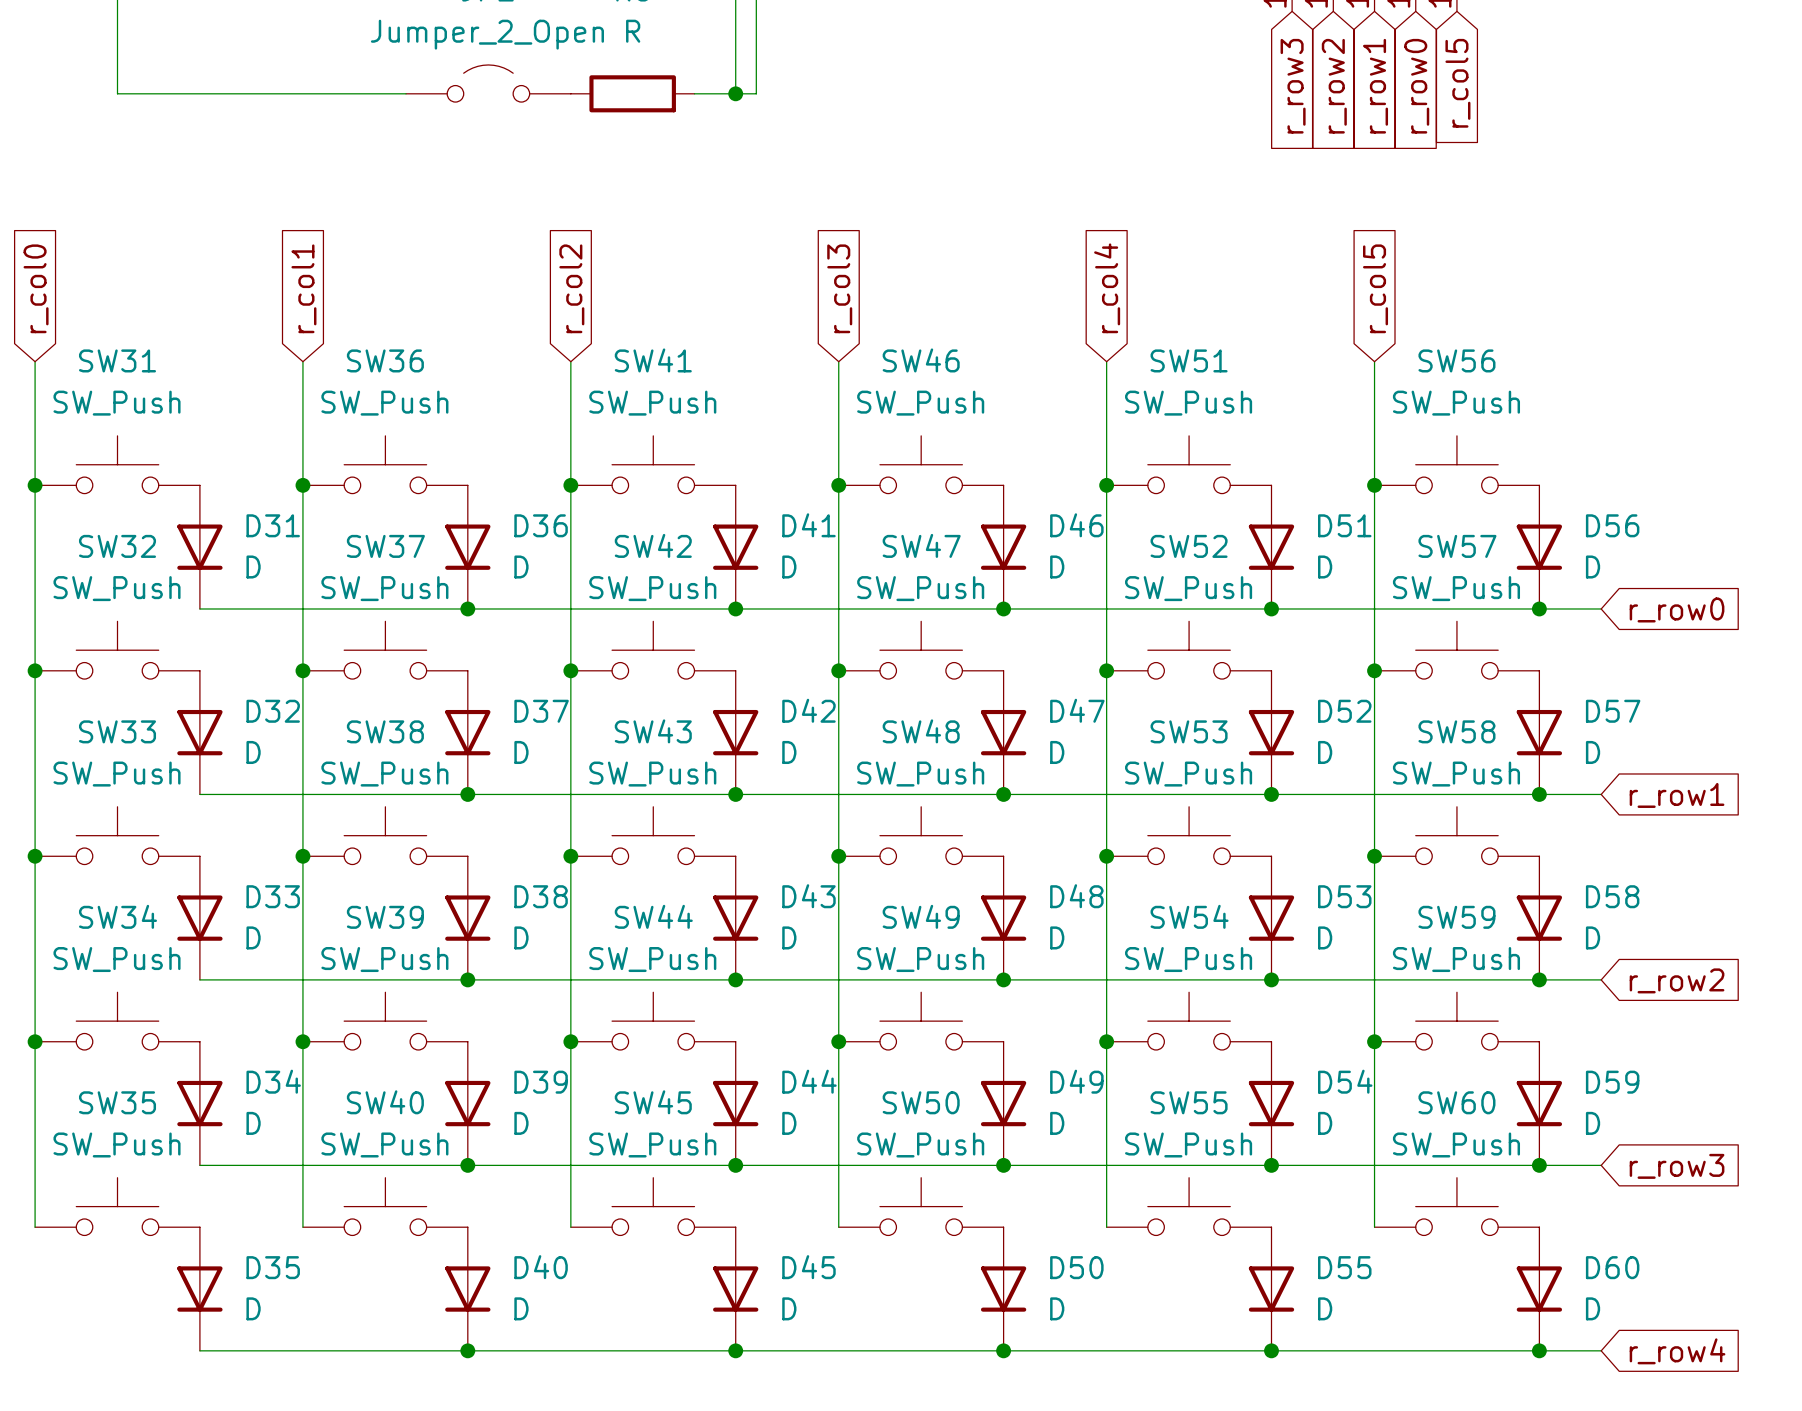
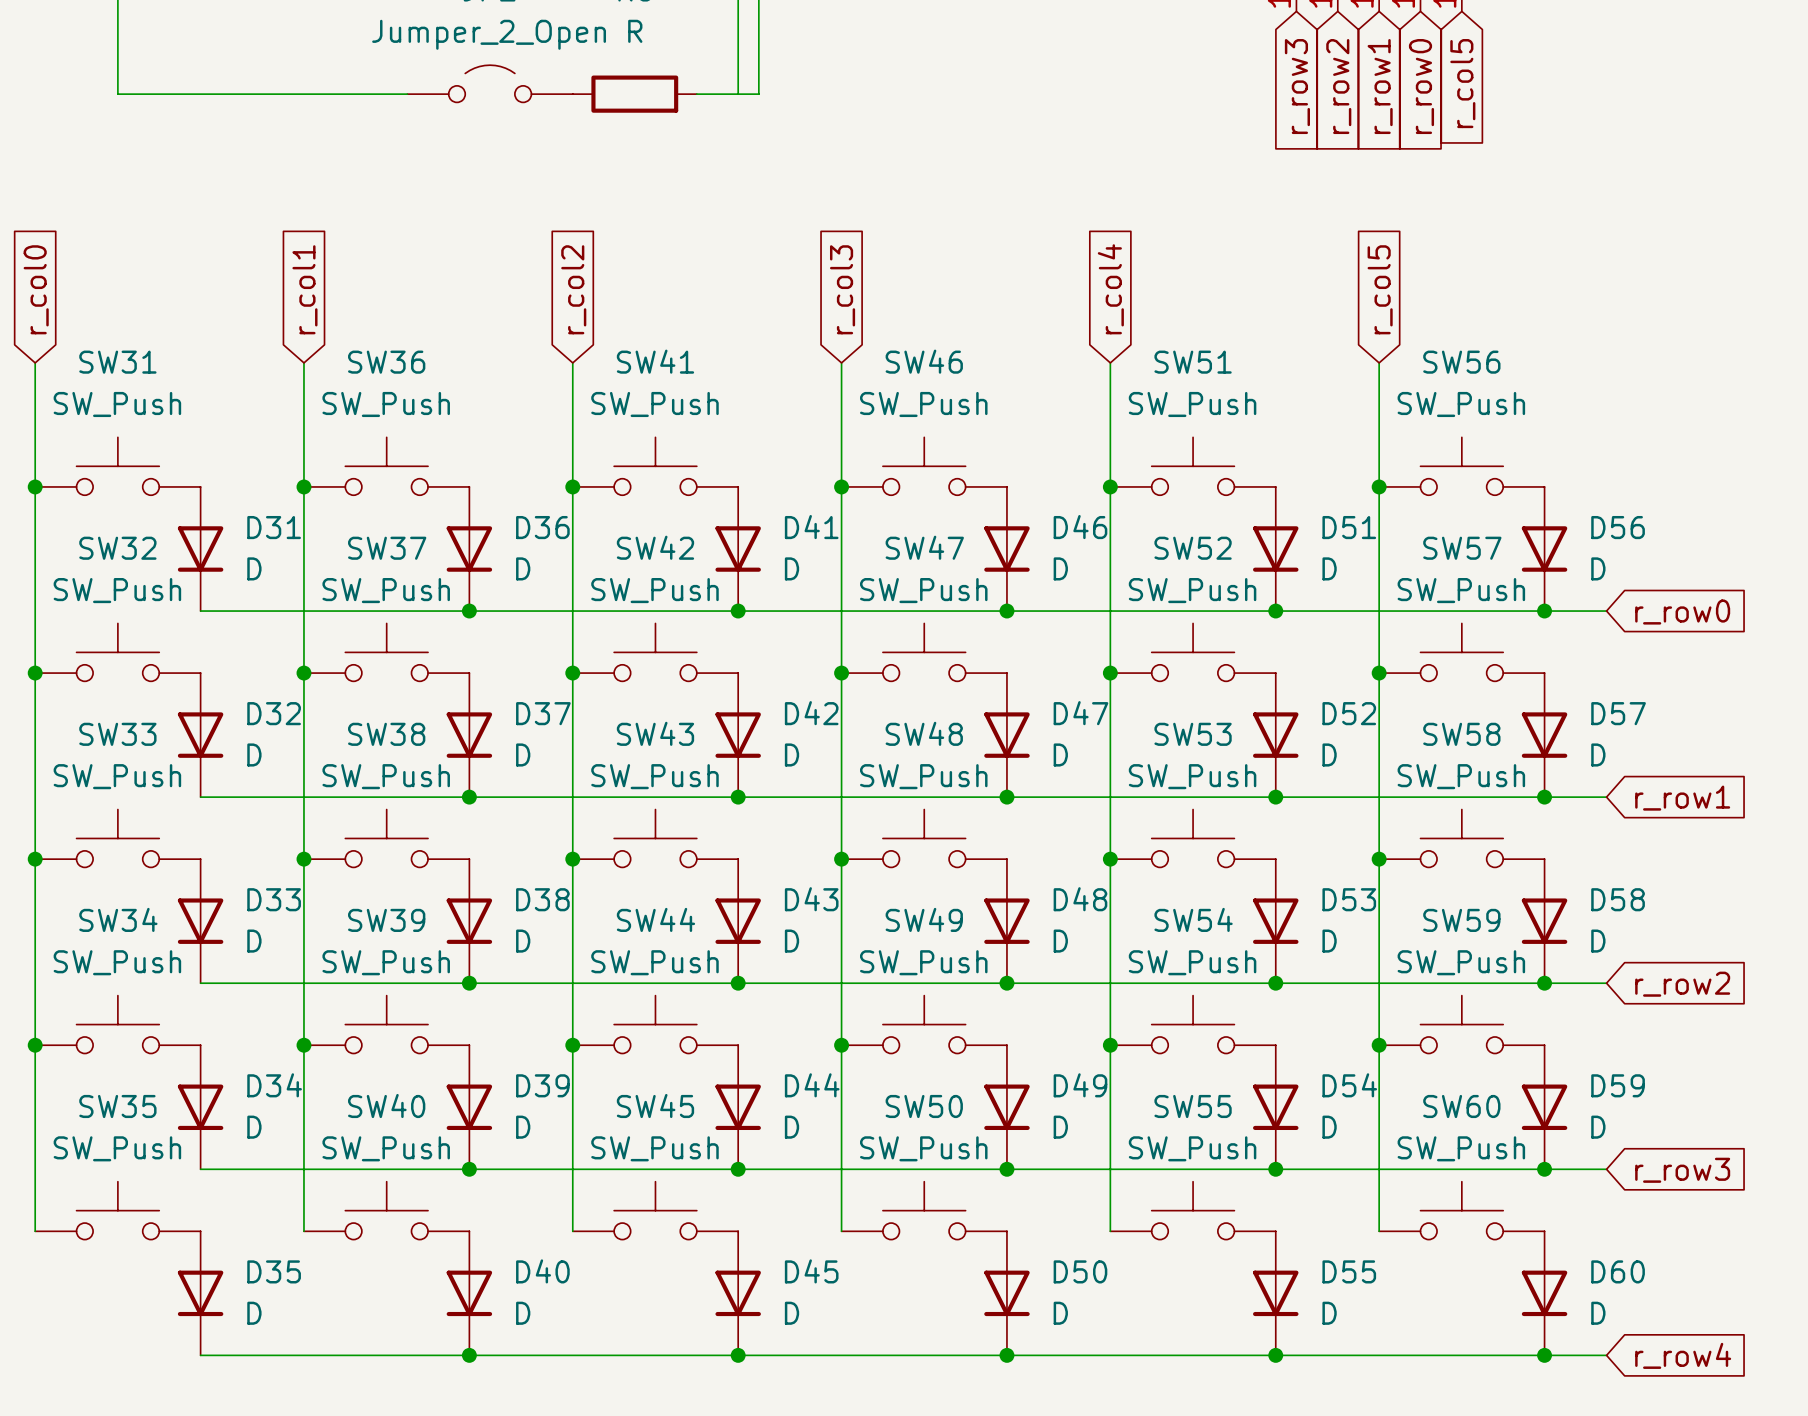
junction: (735, 93) -> none

